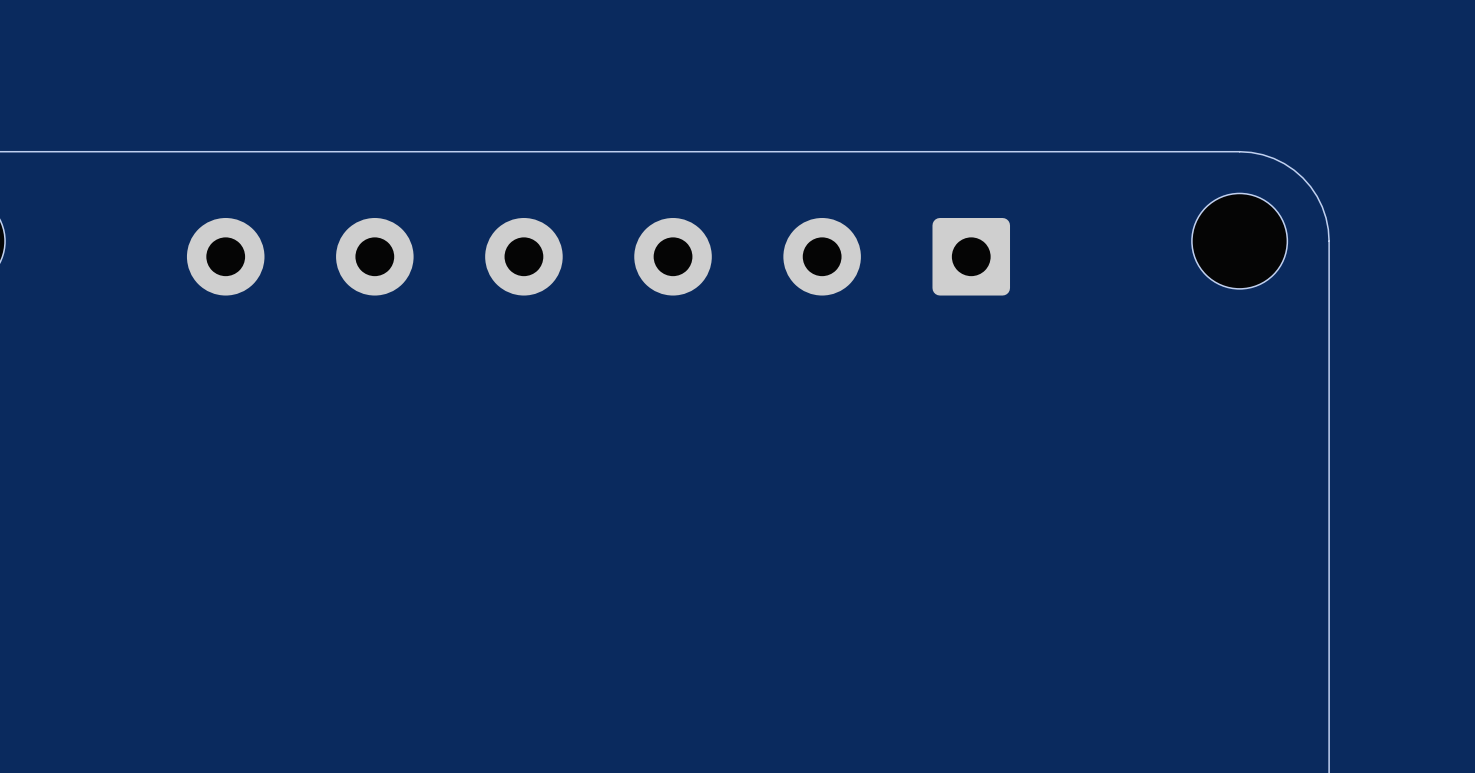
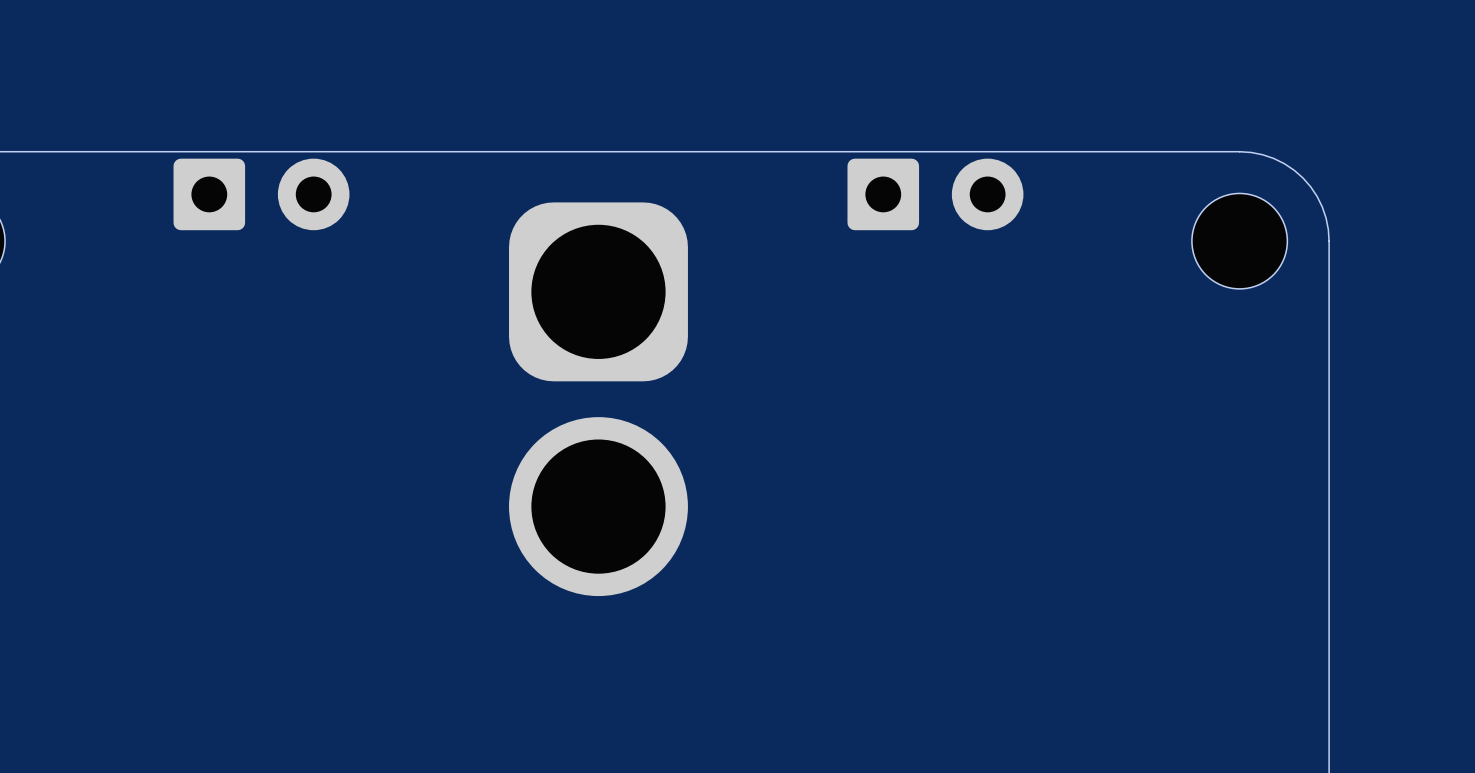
part: none -> (261, 194)
part: none -> (935, 194)
part: (598, 256) -> none
part: none -> (598, 399)

